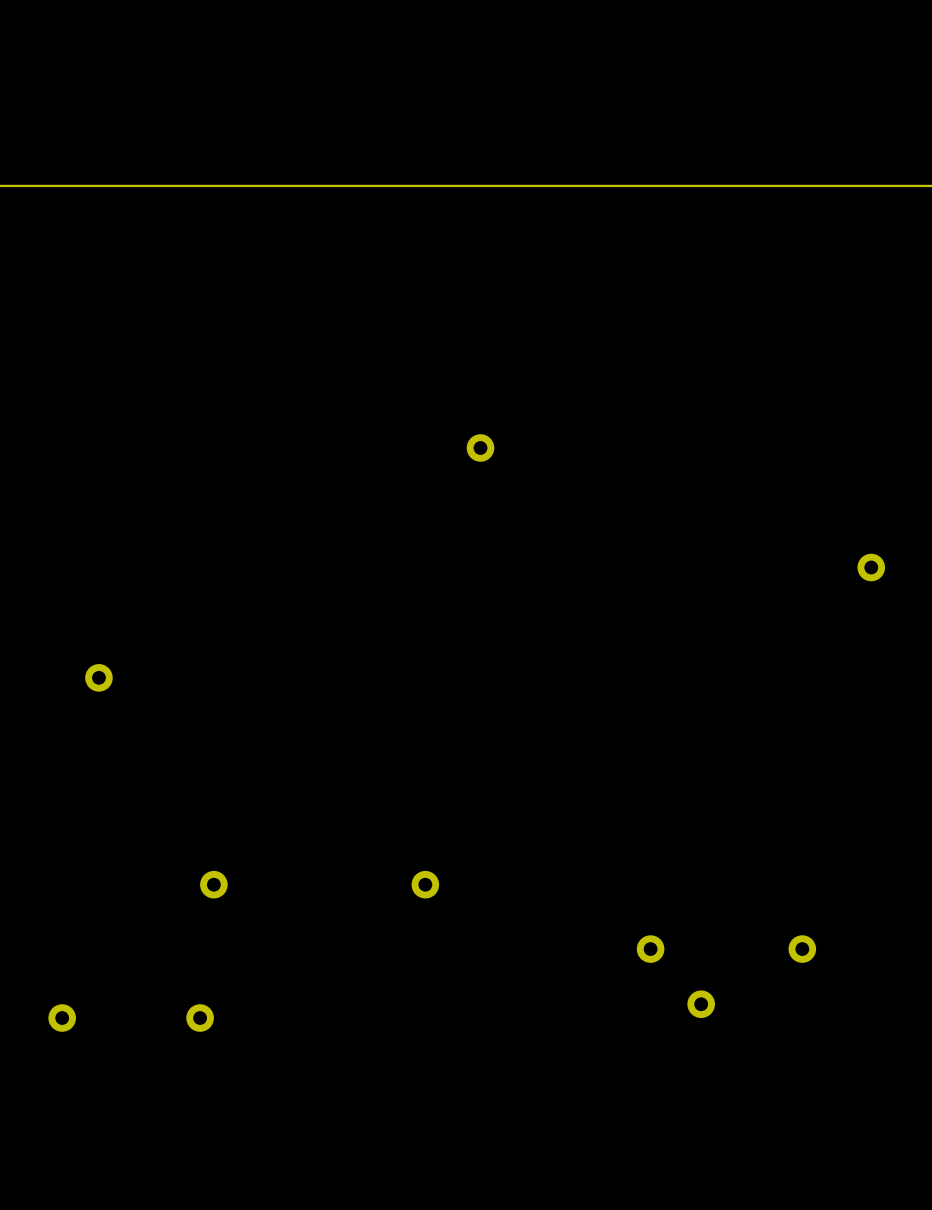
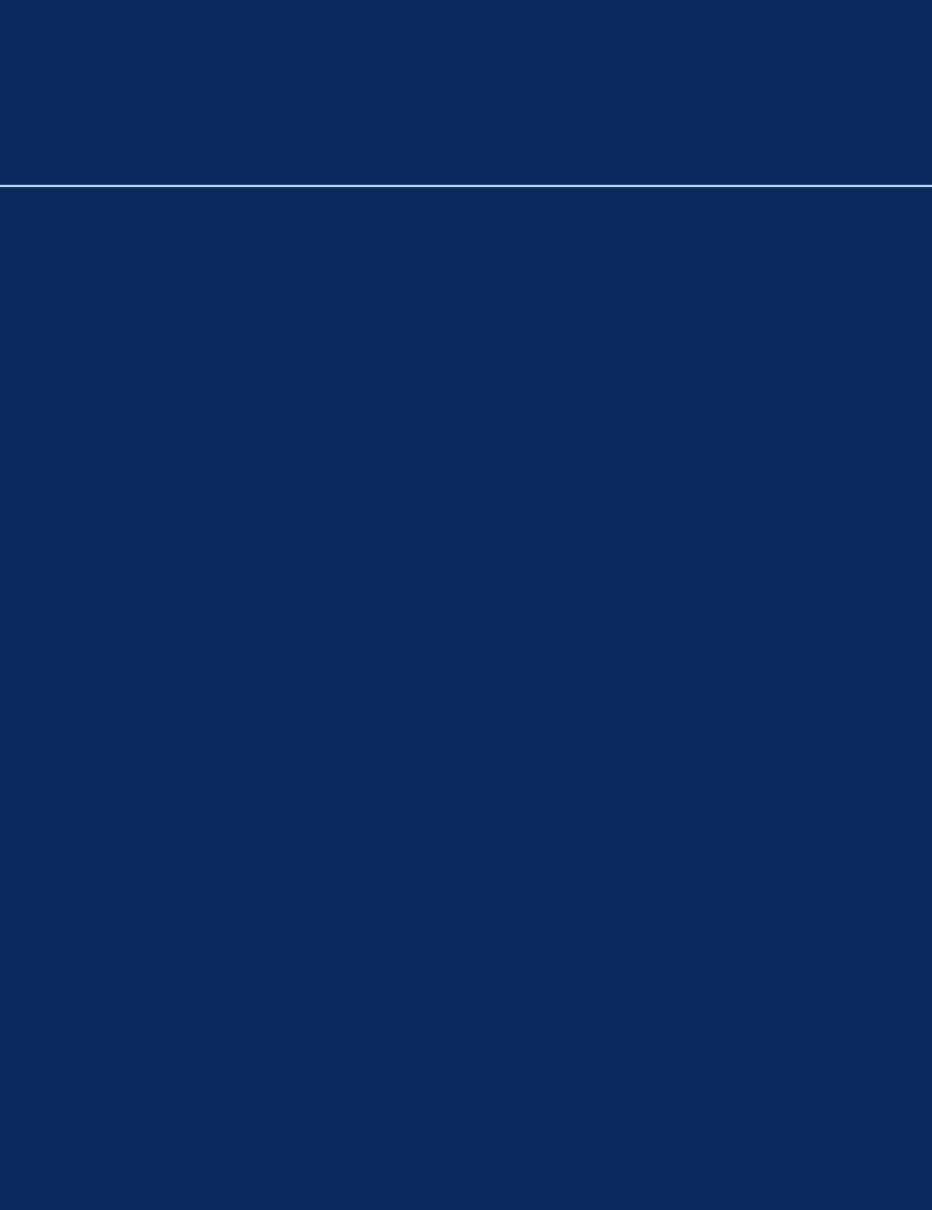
part: (480, 447) -> none
part: (871, 567) -> none
part: (98, 677) -> none
part: (213, 884) -> none
part: (425, 884) -> none
part: (650, 949) -> none
part: (802, 949) -> none
part: (701, 1004) -> none
part: (62, 1018) -> none
part: (200, 1018) -> none

